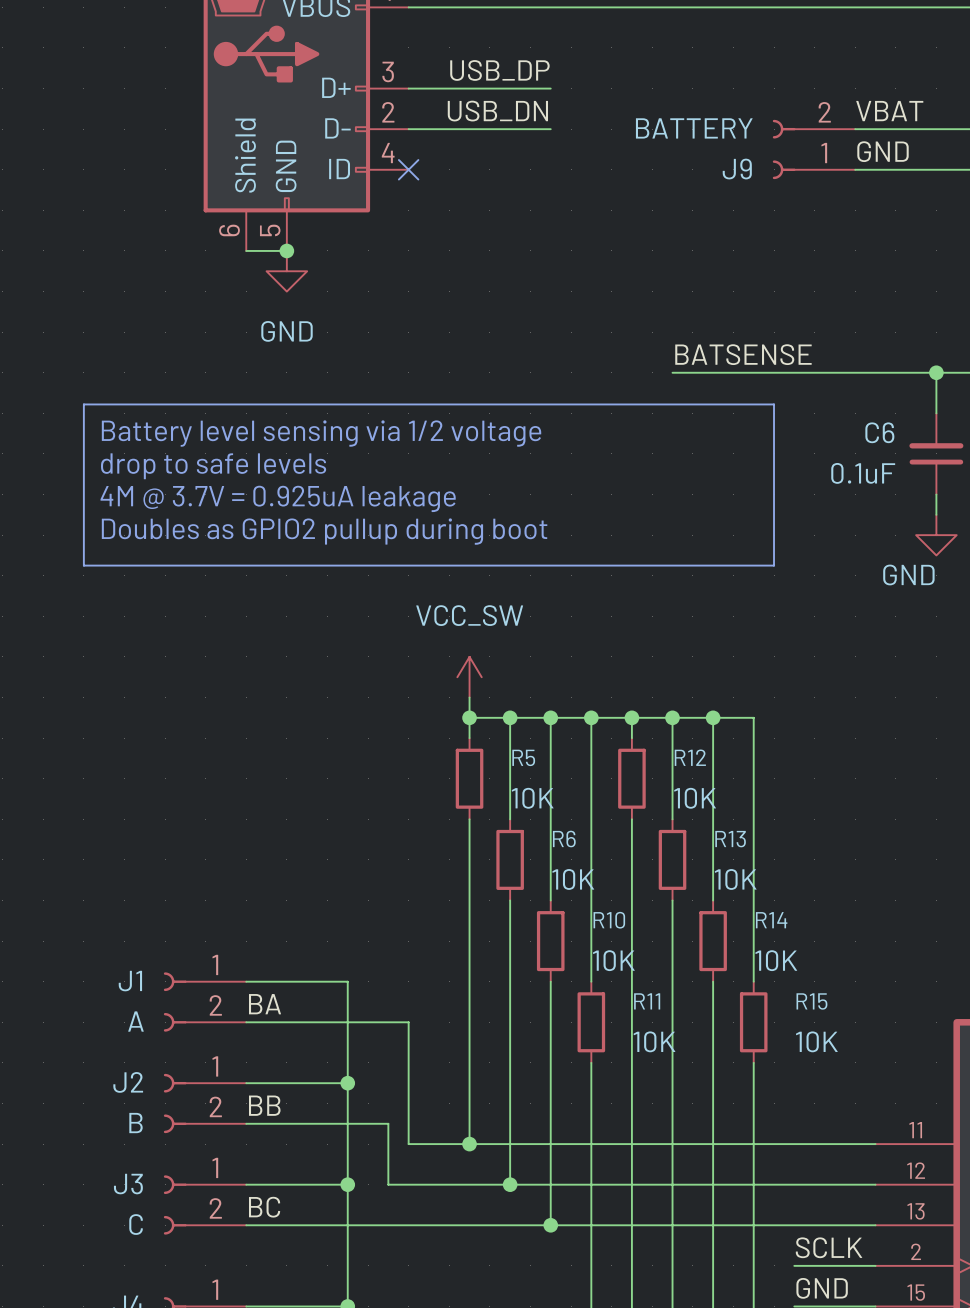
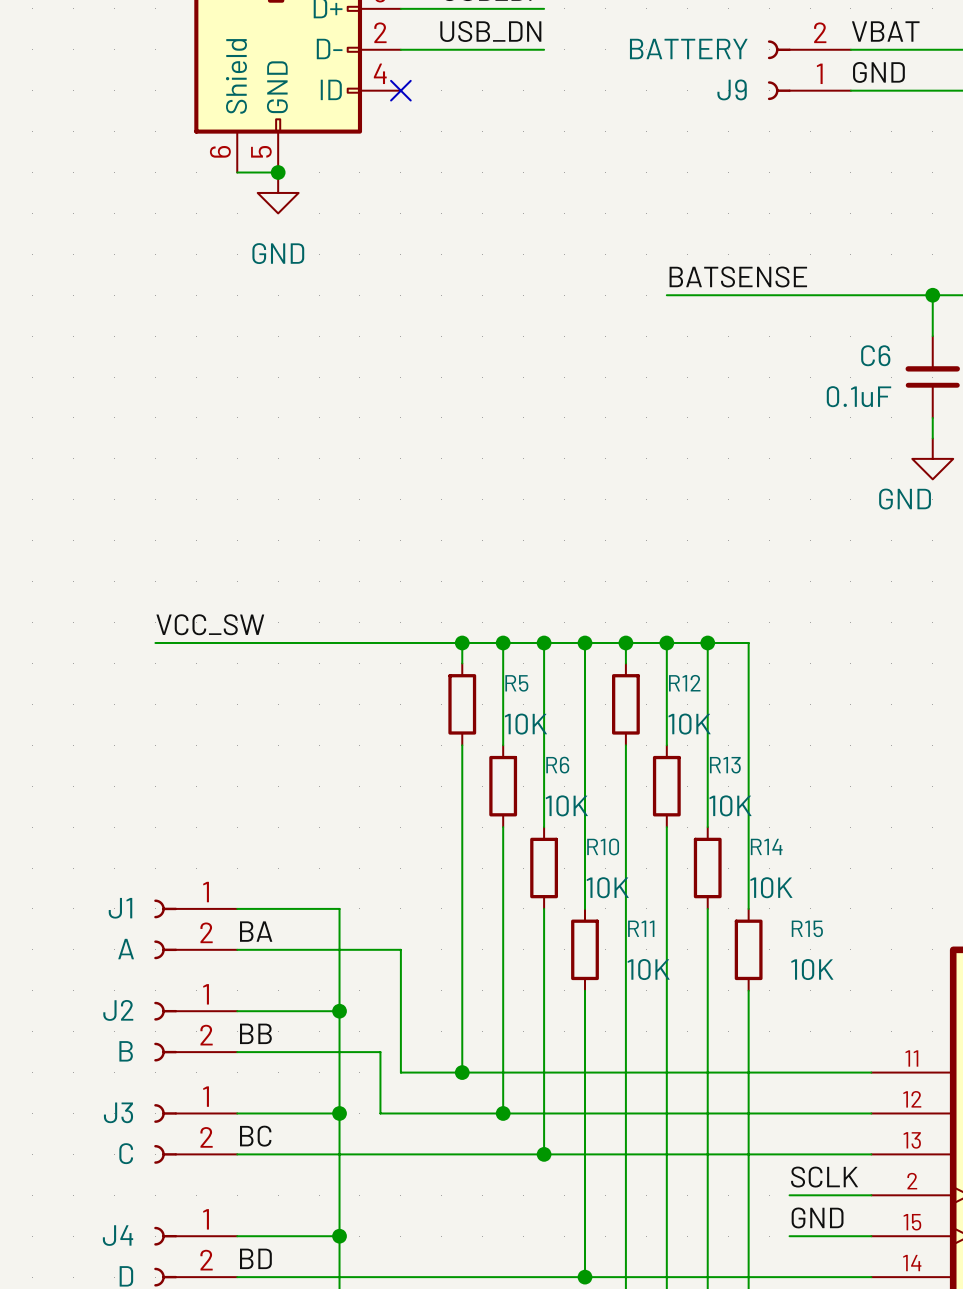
line: (83, 404) (774, 404) (774, 565) (83, 565) (83, 404) -> none
text: Battery level sensing via 1/2 voltage (321, 433) -> none
text: drop to safe levels (213, 466) -> none
text: 4M @ 3.7V = 0.925uA leakage (278, 498) -> none
text: Doubles as GPIO2 pullup during boot (324, 531) -> none
power symbol: VCC_SW (469, 677) -> none
wire: (469, 697) (469, 717) -> (155, 642) (462, 642)
label: none -> VCC_SW (210, 624)

